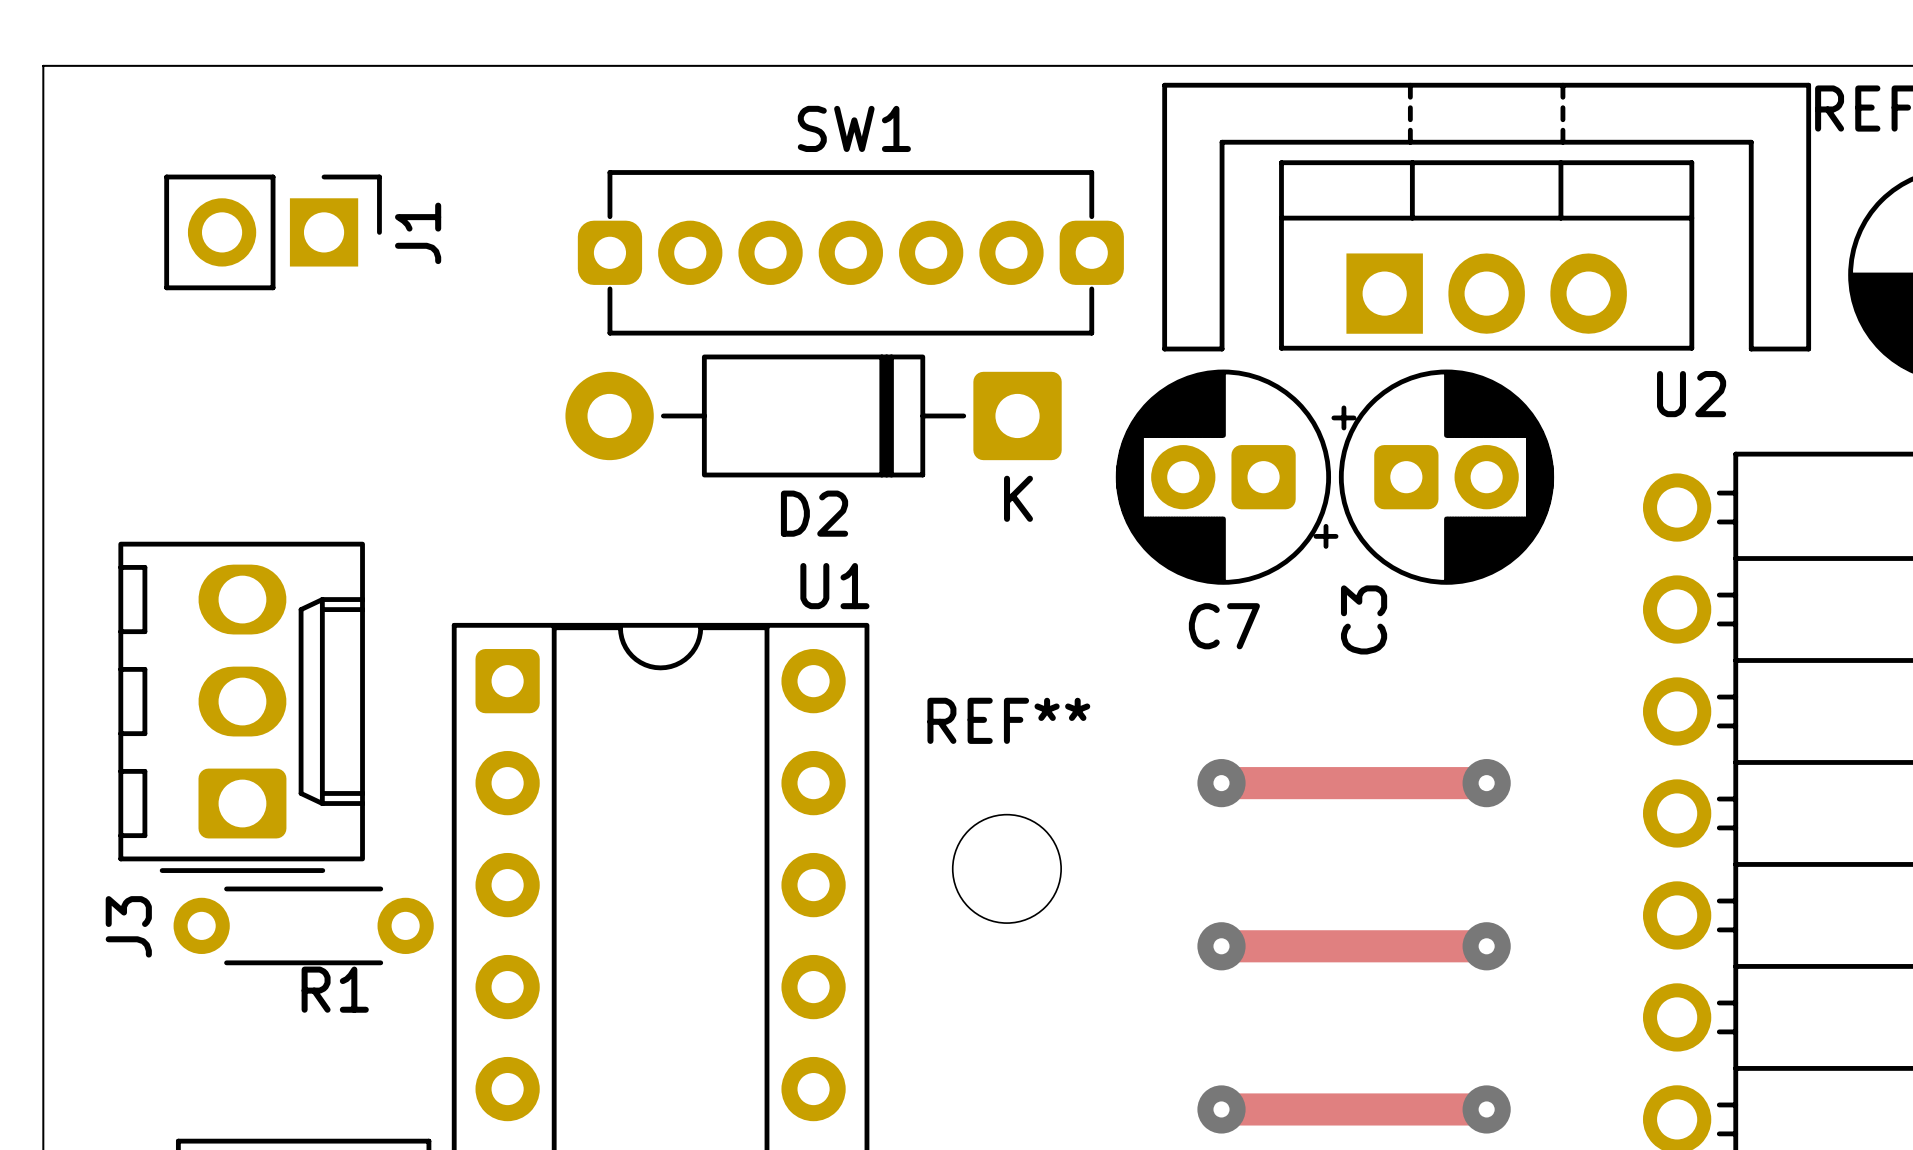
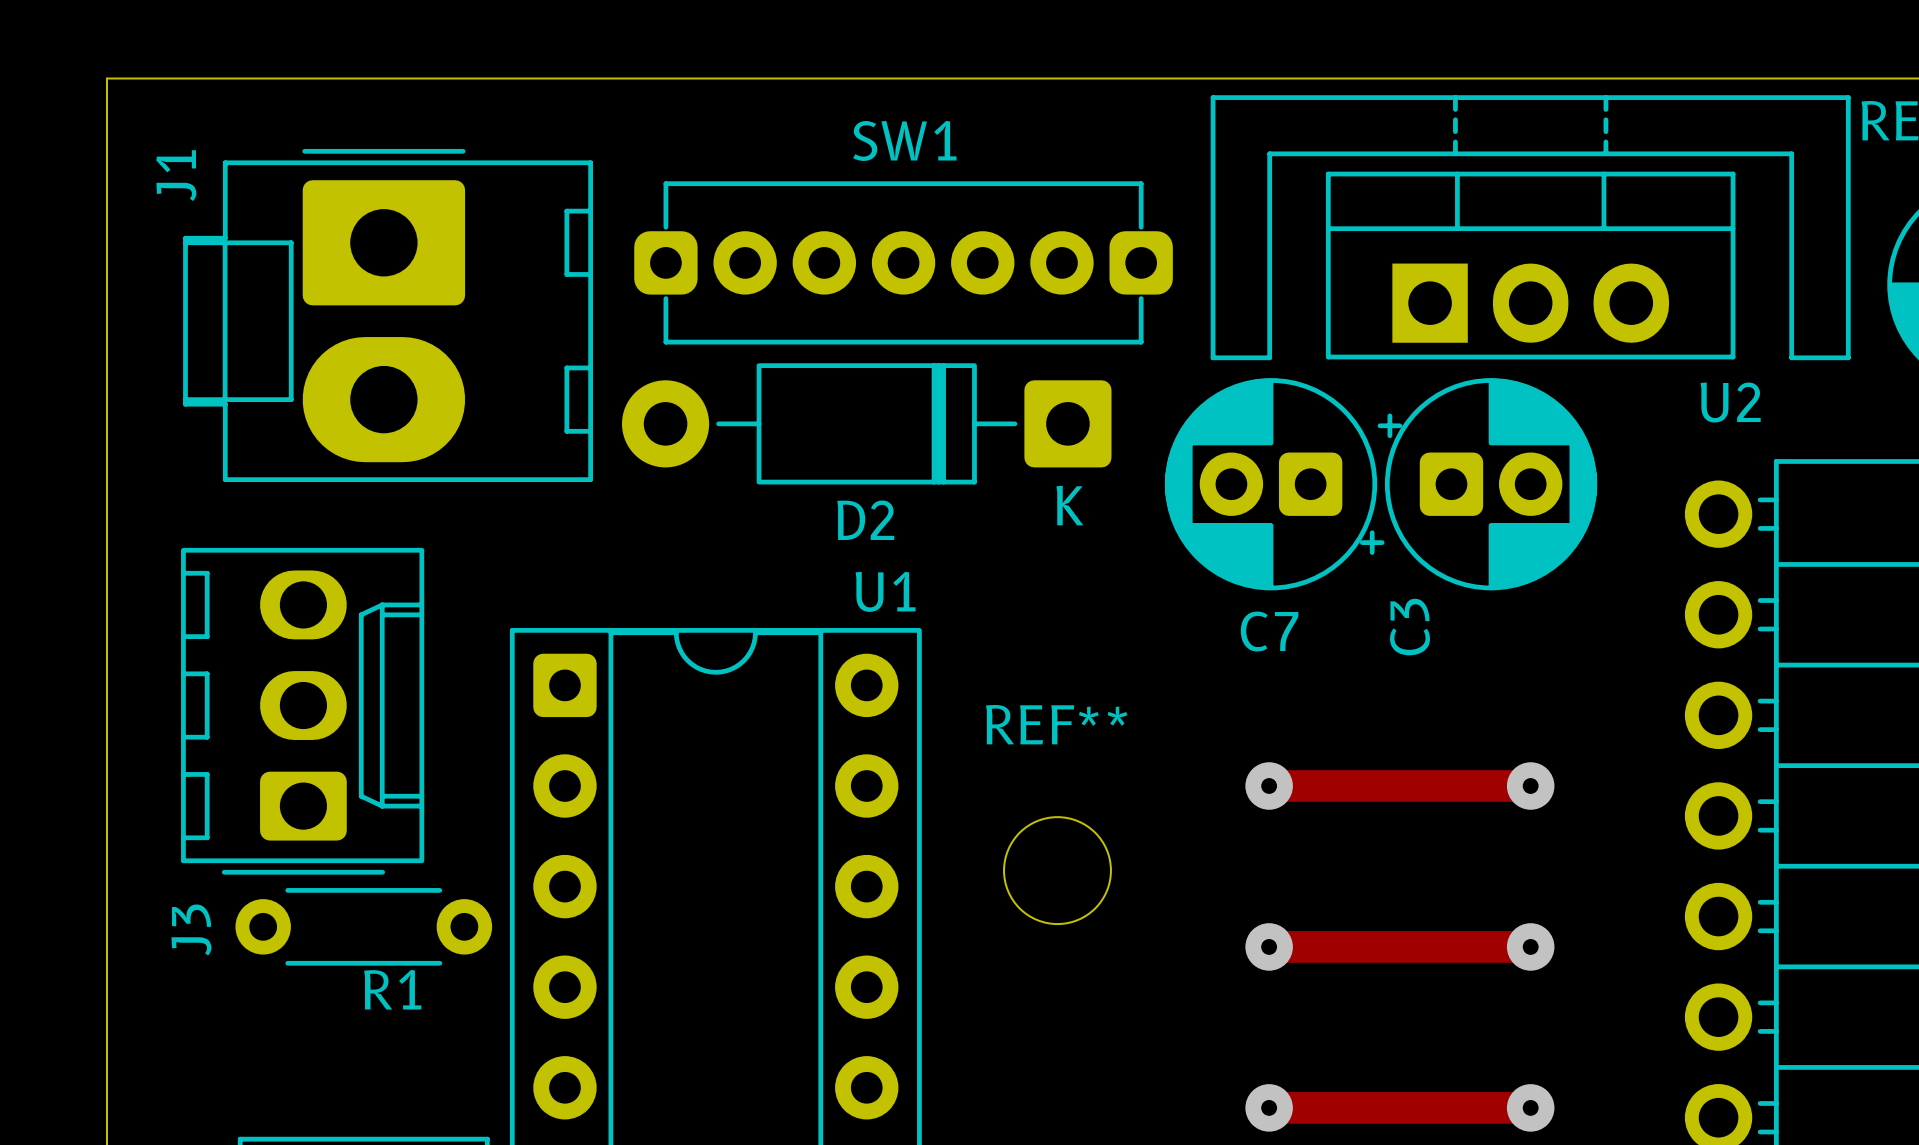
J1 footprint: [164, 174, 382, 291] -> [183, 148, 594, 483]
J1 name position: J1 (418, 233) -> J1 (176, 175)

